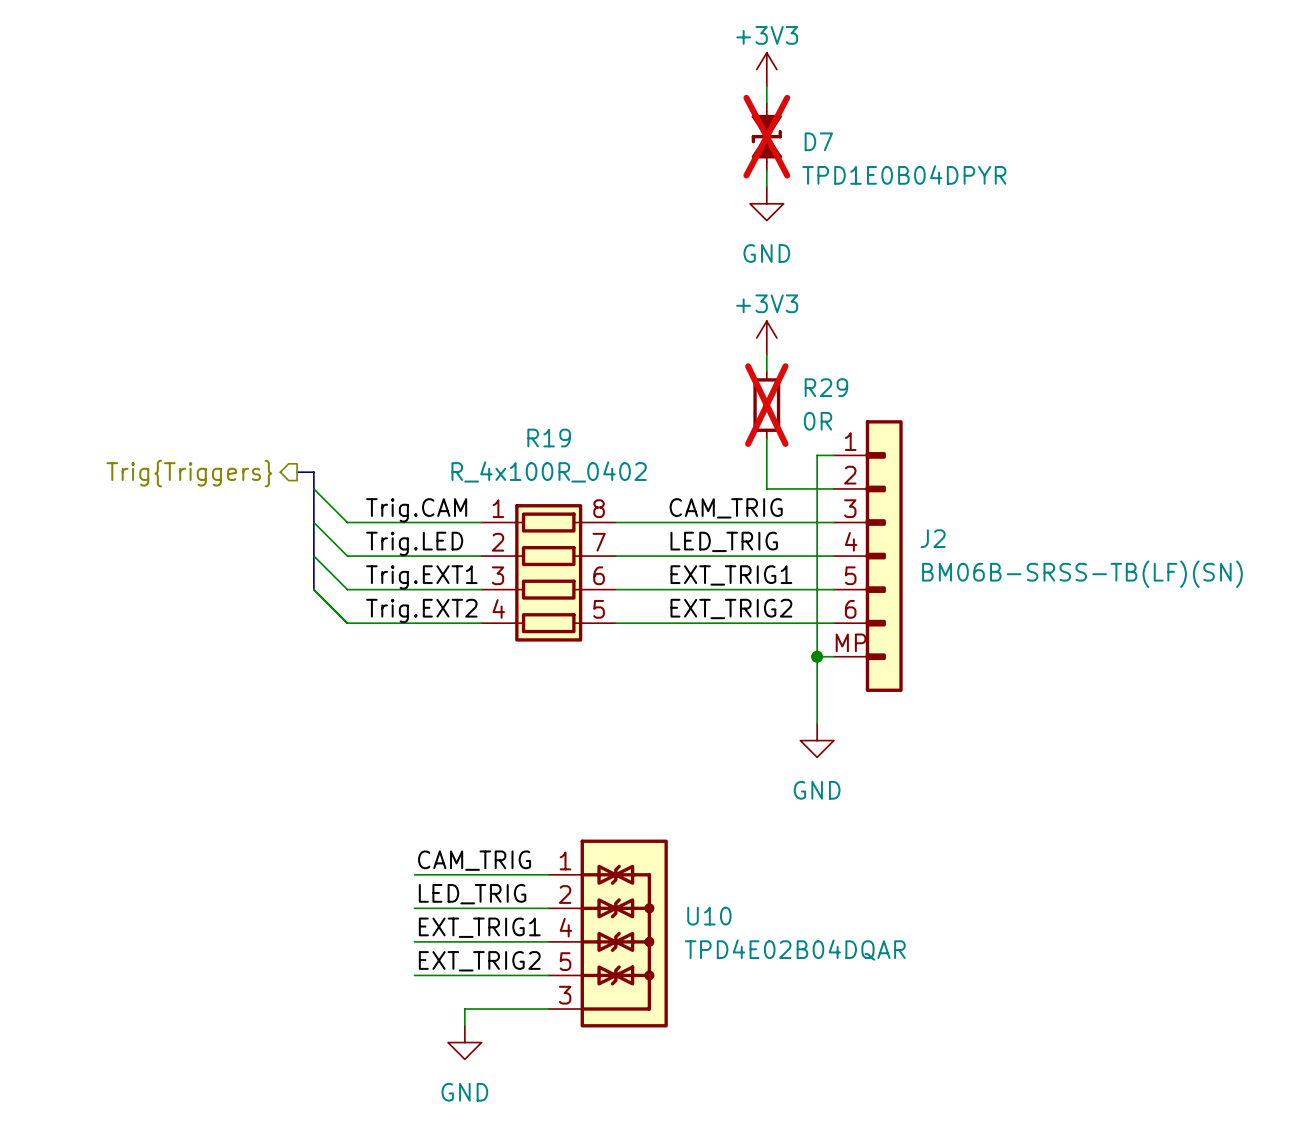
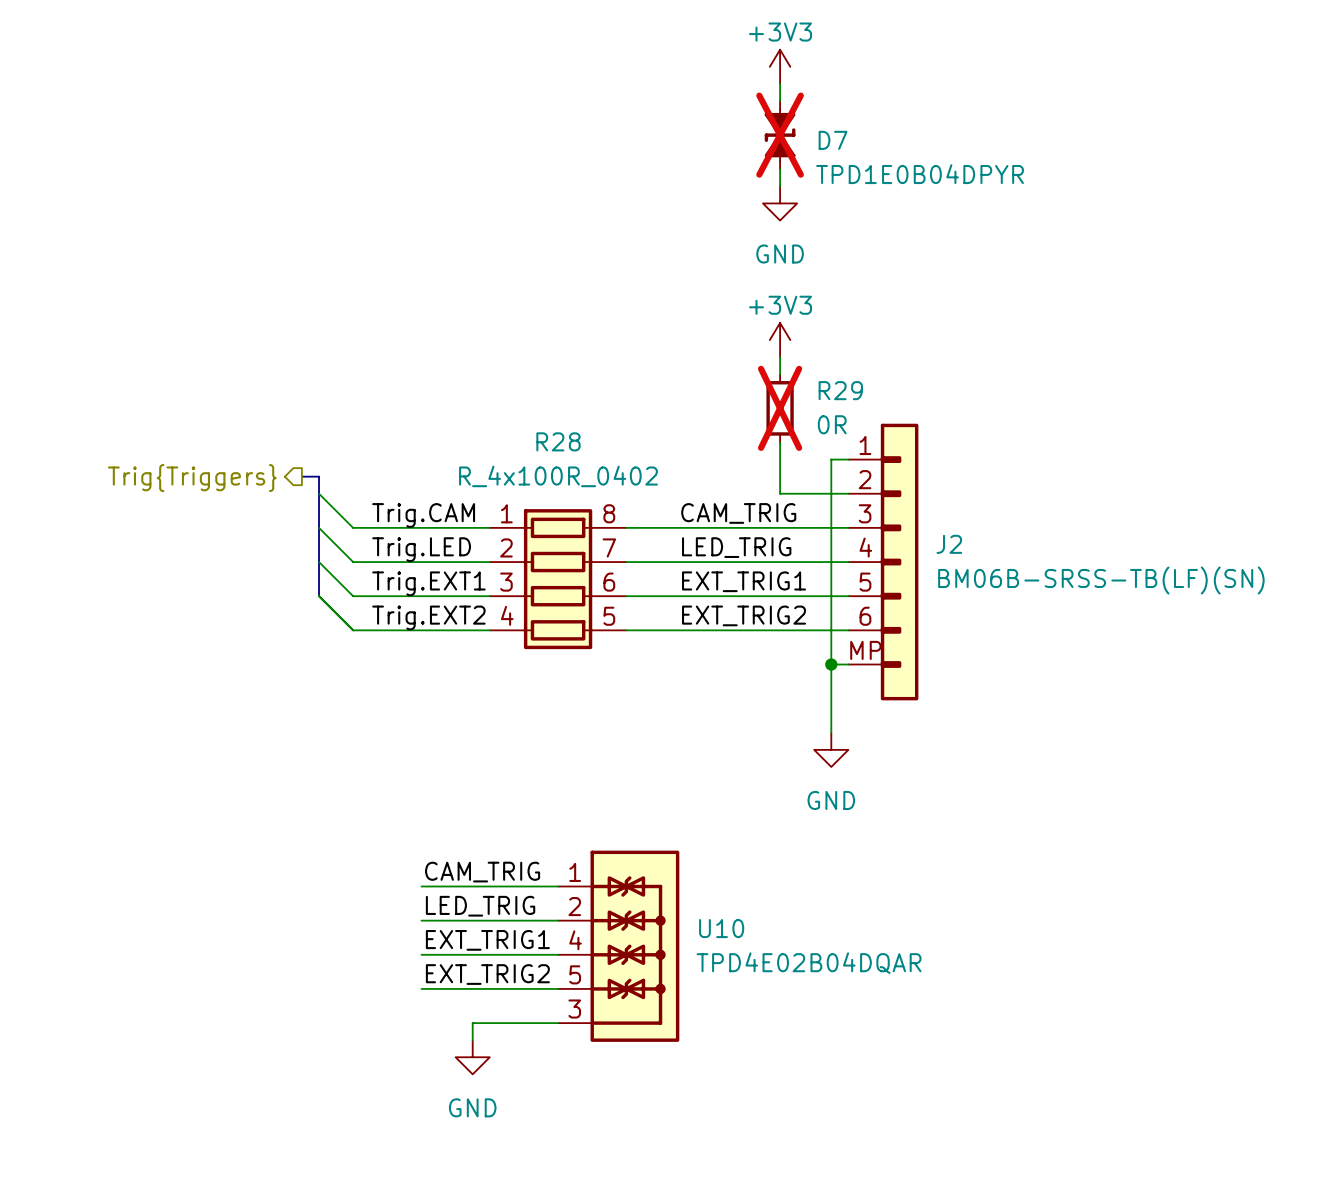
R19 name: R19 (549, 438) -> R28 (558, 441)

